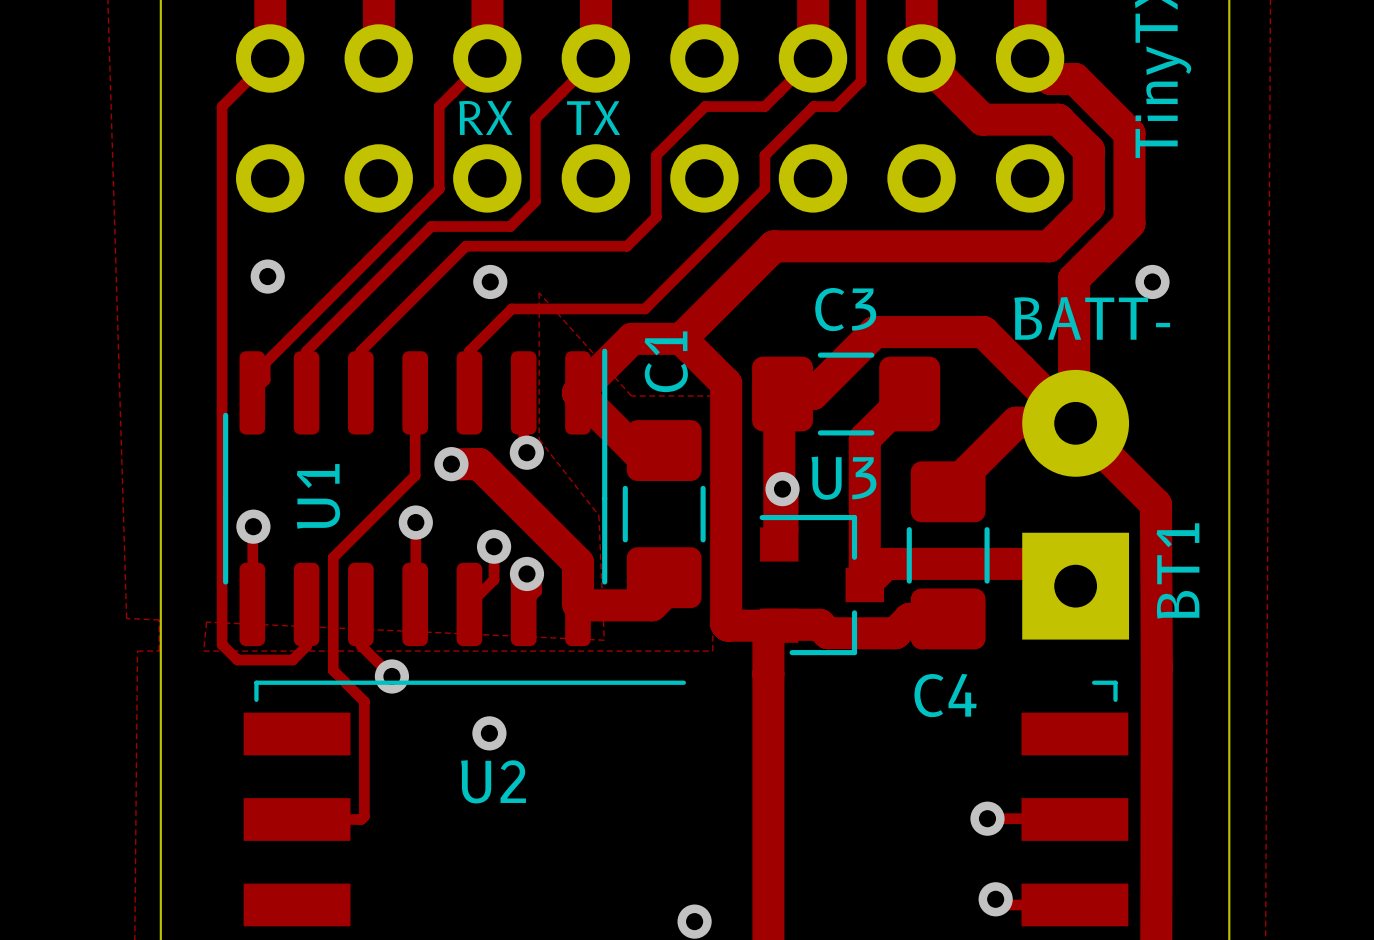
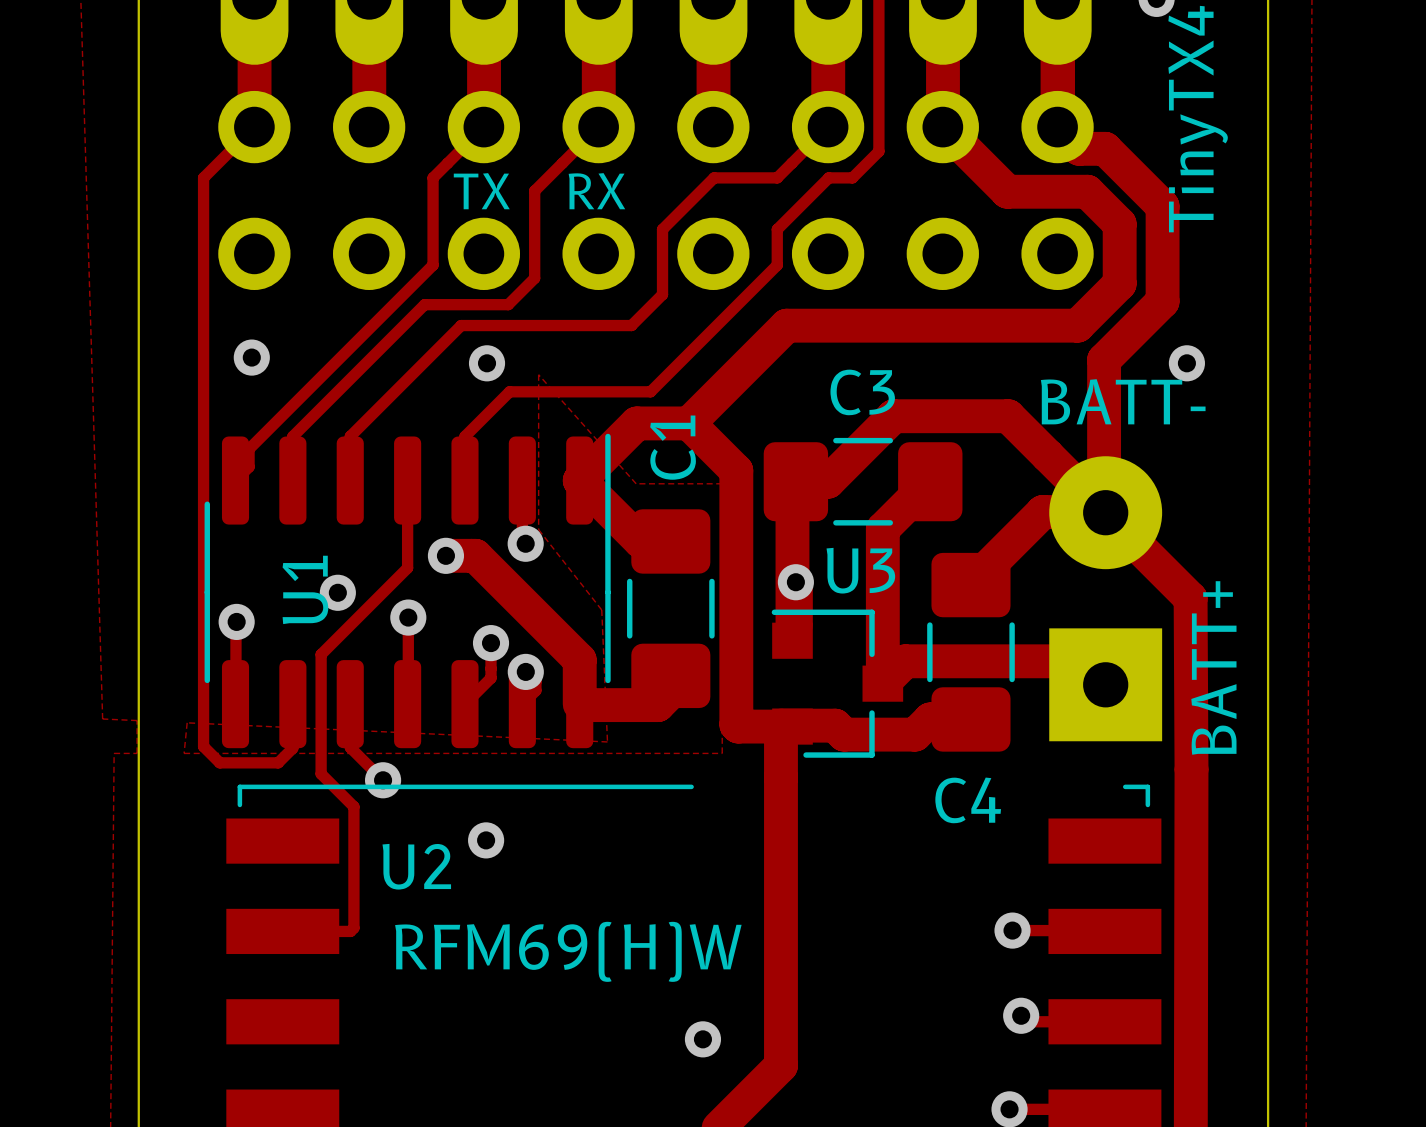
text: RX (485, 117) -> TX (481, 191)
text: TX (593, 117) -> RX (596, 191)
via: none -> (337, 592)
BT1 name: BT1 (1178, 570) -> BATT+ (1213, 667)
U2 name position: U2 (493, 781) -> U2 (416, 866)
text: none -> RFM69(H)W (568, 951)

